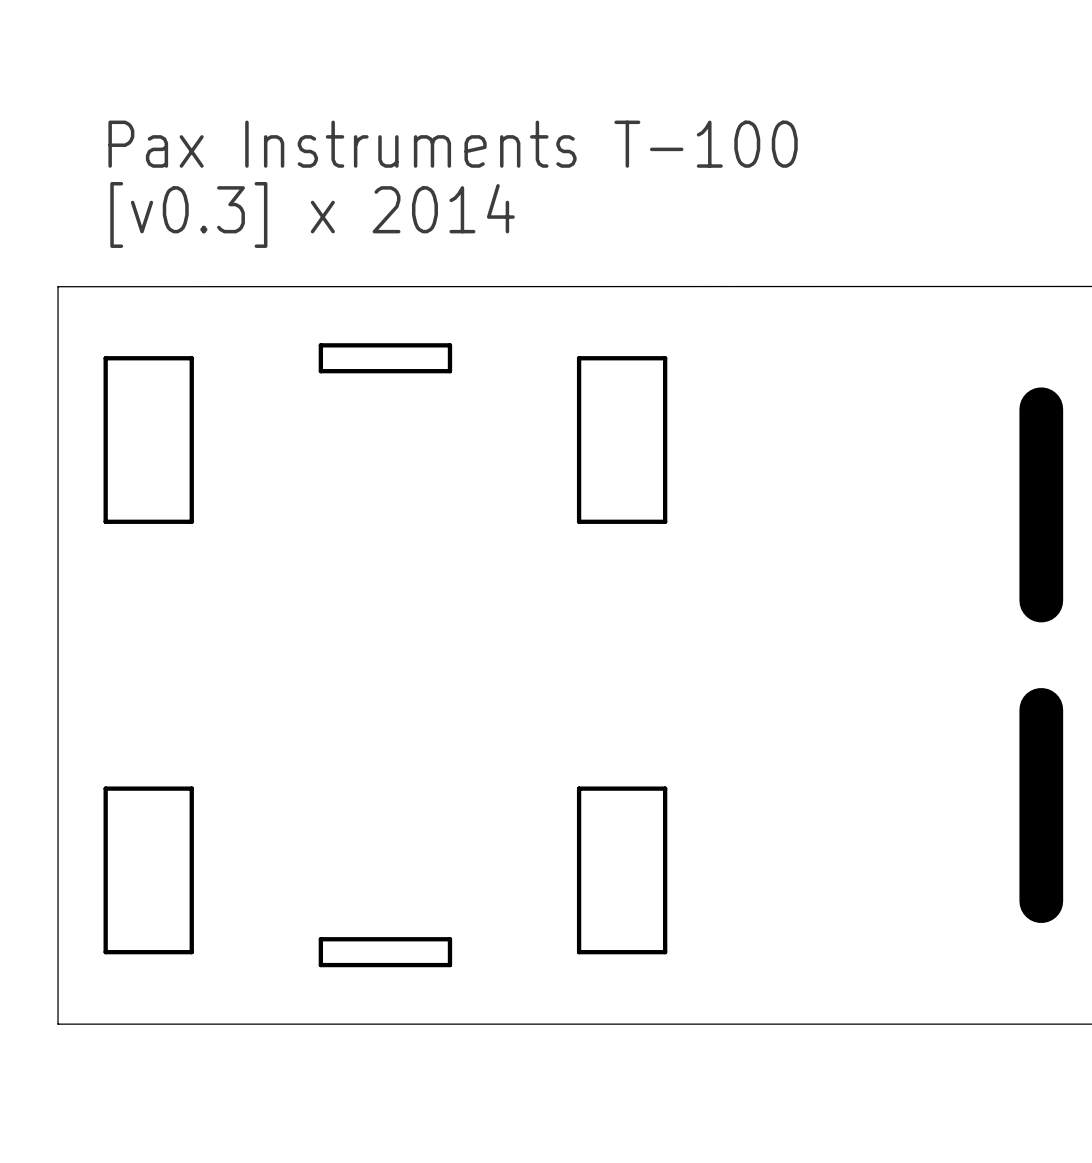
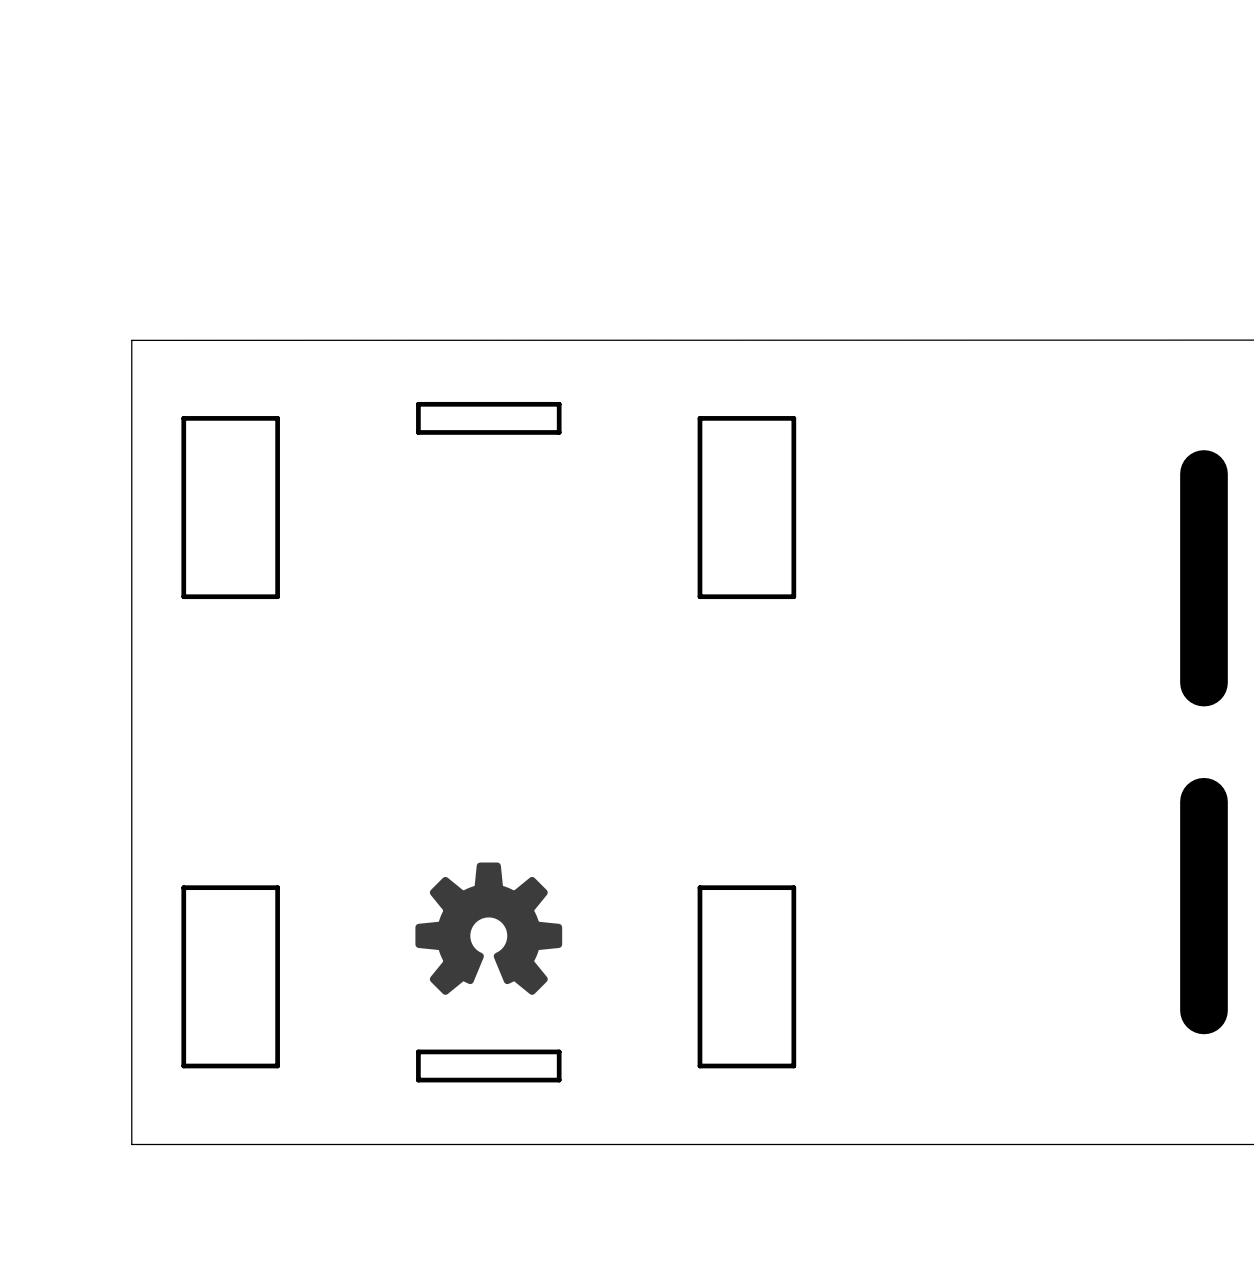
text: Pax Instruments T-100 (453, 144) -> none
text: [v0.3] x 2014 (312, 214) -> none
drawing: none -> [415, 862, 563, 995]

